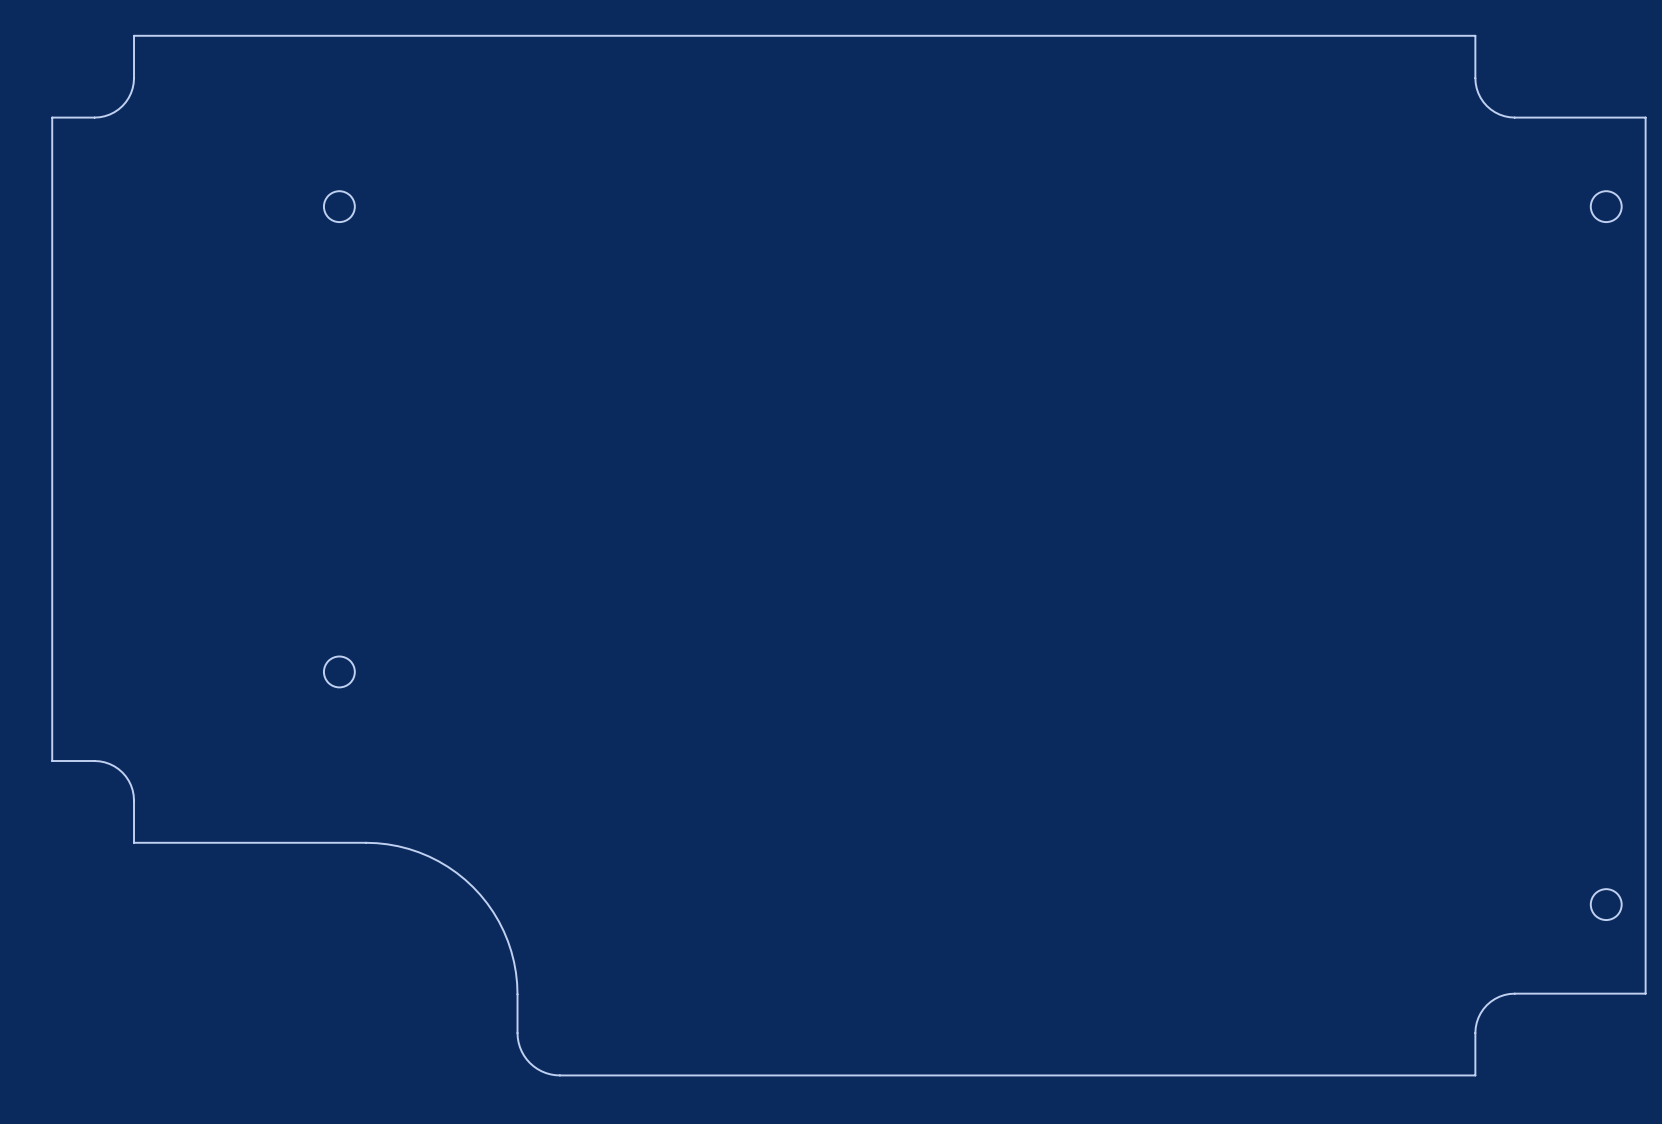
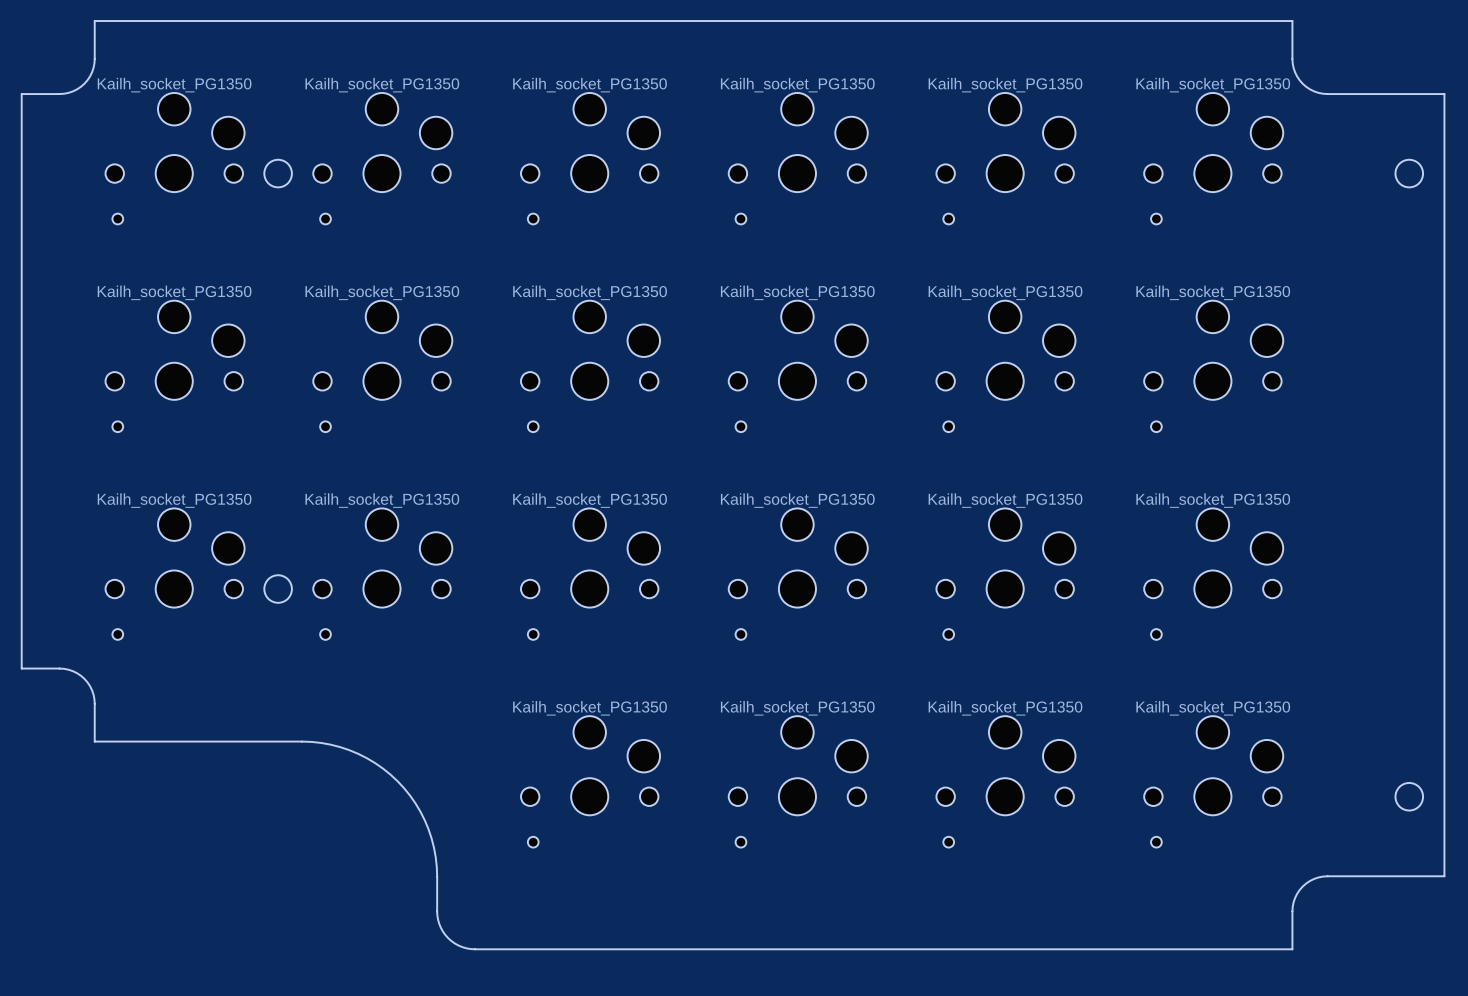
part: none -> Kailh_socket_PG1350 (175, 158)
part: none -> Kailh_socket_PG1350 (382, 158)
part: none -> Kailh_socket_PG1350 (590, 158)
part: none -> Kailh_socket_PG1350 (798, 158)
part: none -> Kailh_socket_PG1350 (1005, 158)
part: none -> Kailh_socket_PG1350 (1213, 158)
part: none -> Kailh_socket_PG1350 (175, 366)
part: none -> Kailh_socket_PG1350 (382, 366)
part: none -> Kailh_socket_PG1350 (590, 366)
part: none -> Kailh_socket_PG1350 (798, 366)
part: none -> Kailh_socket_PG1350 (1005, 366)
part: none -> Kailh_socket_PG1350 (1213, 366)
part: none -> Kailh_socket_PG1350 (175, 574)
part: none -> Kailh_socket_PG1350 (382, 574)
part: none -> Kailh_socket_PG1350 (590, 574)
part: none -> Kailh_socket_PG1350 (798, 574)
part: none -> Kailh_socket_PG1350 (1005, 574)
part: none -> Kailh_socket_PG1350 (1213, 574)
part: none -> Kailh_socket_PG1350 (590, 781)
part: none -> Kailh_socket_PG1350 (798, 781)
part: none -> Kailh_socket_PG1350 (1005, 781)
part: none -> Kailh_socket_PG1350 (1213, 781)

